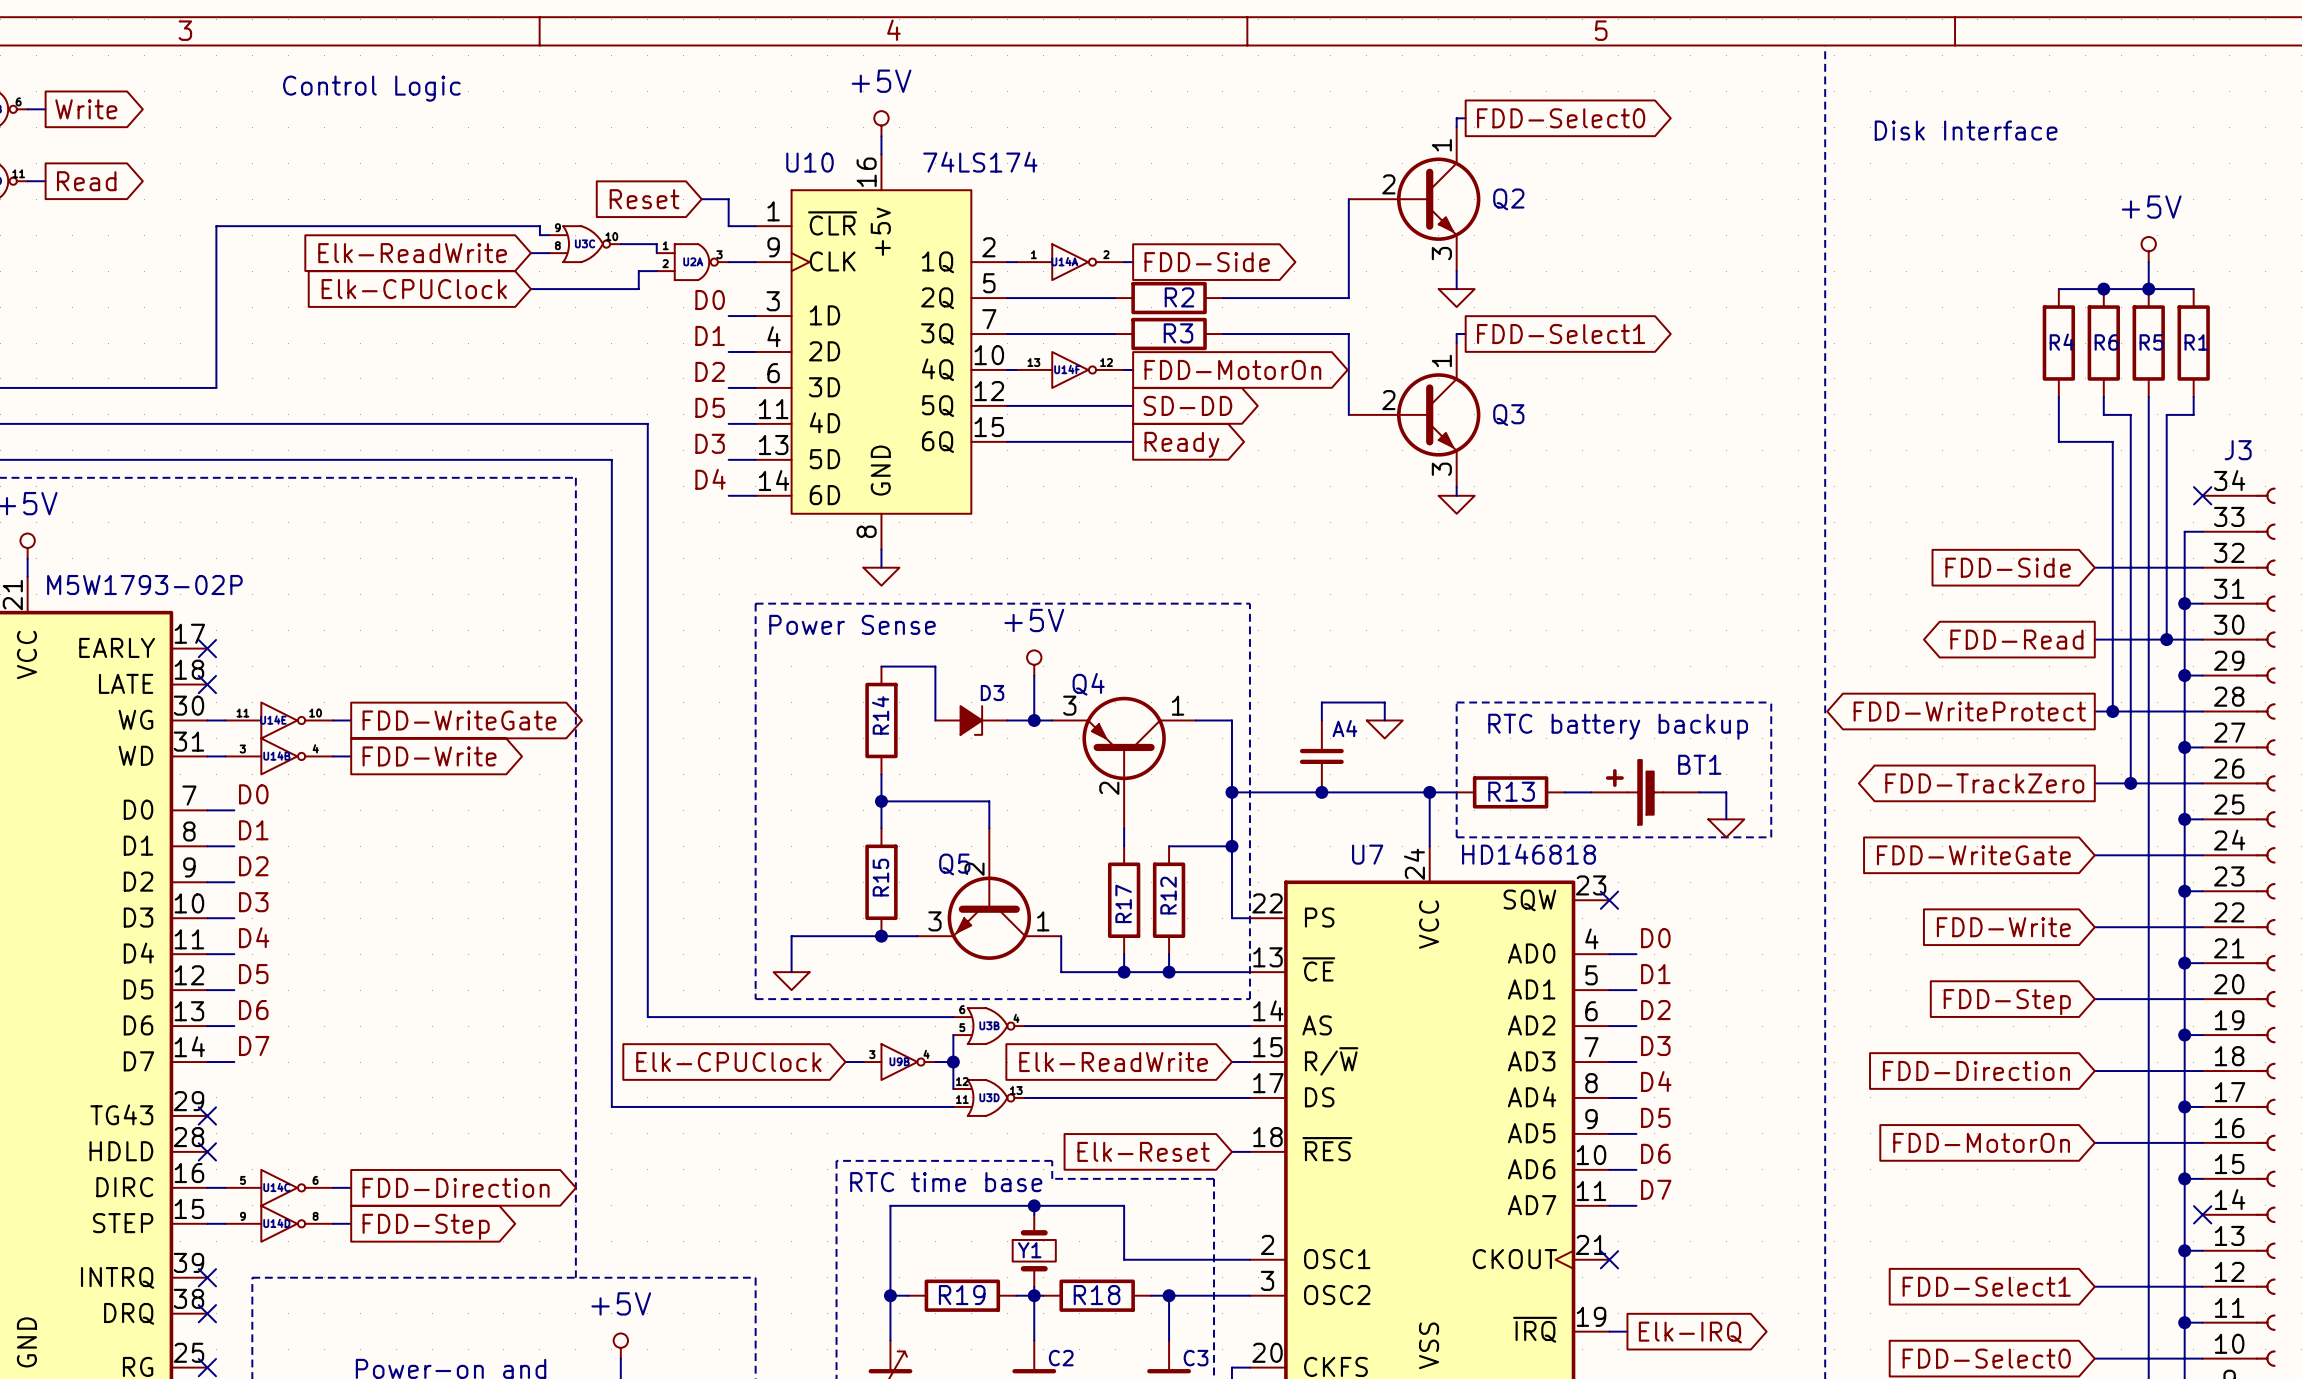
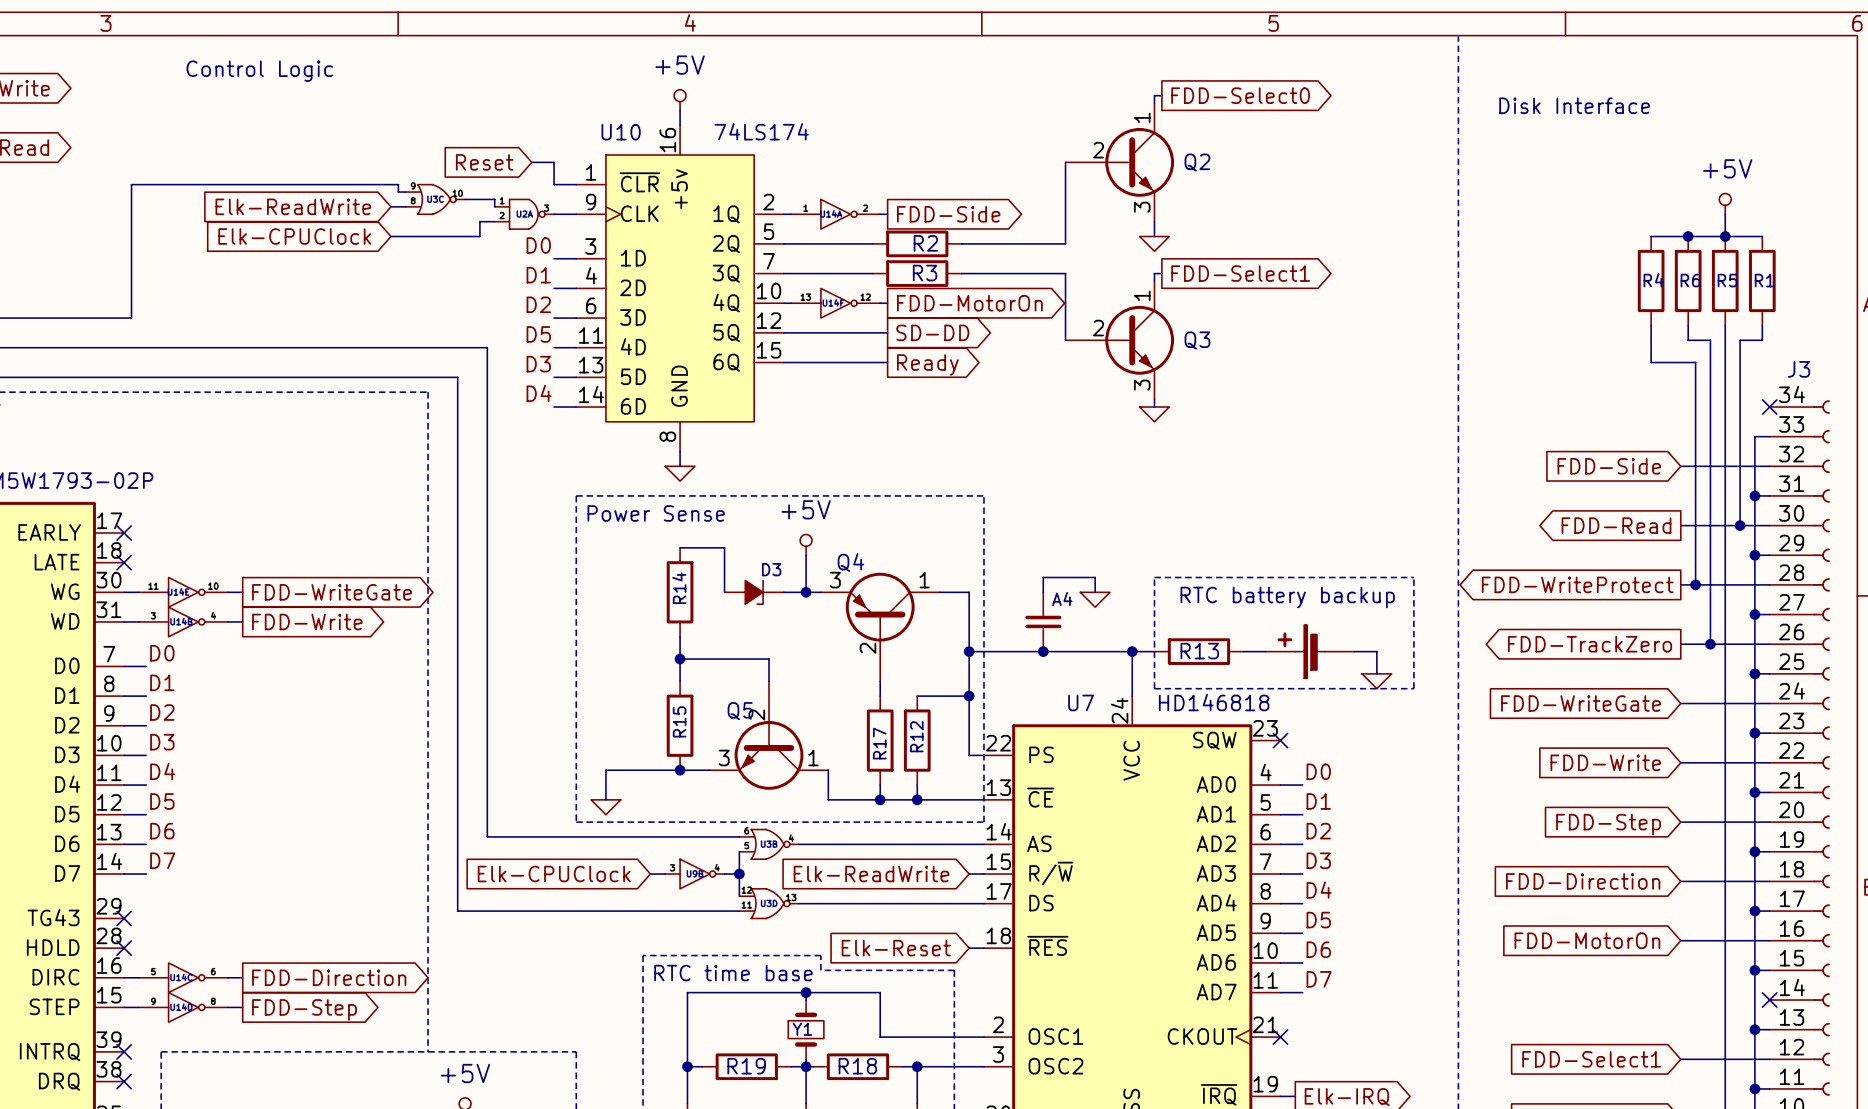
BT1: (1645, 792) -> none

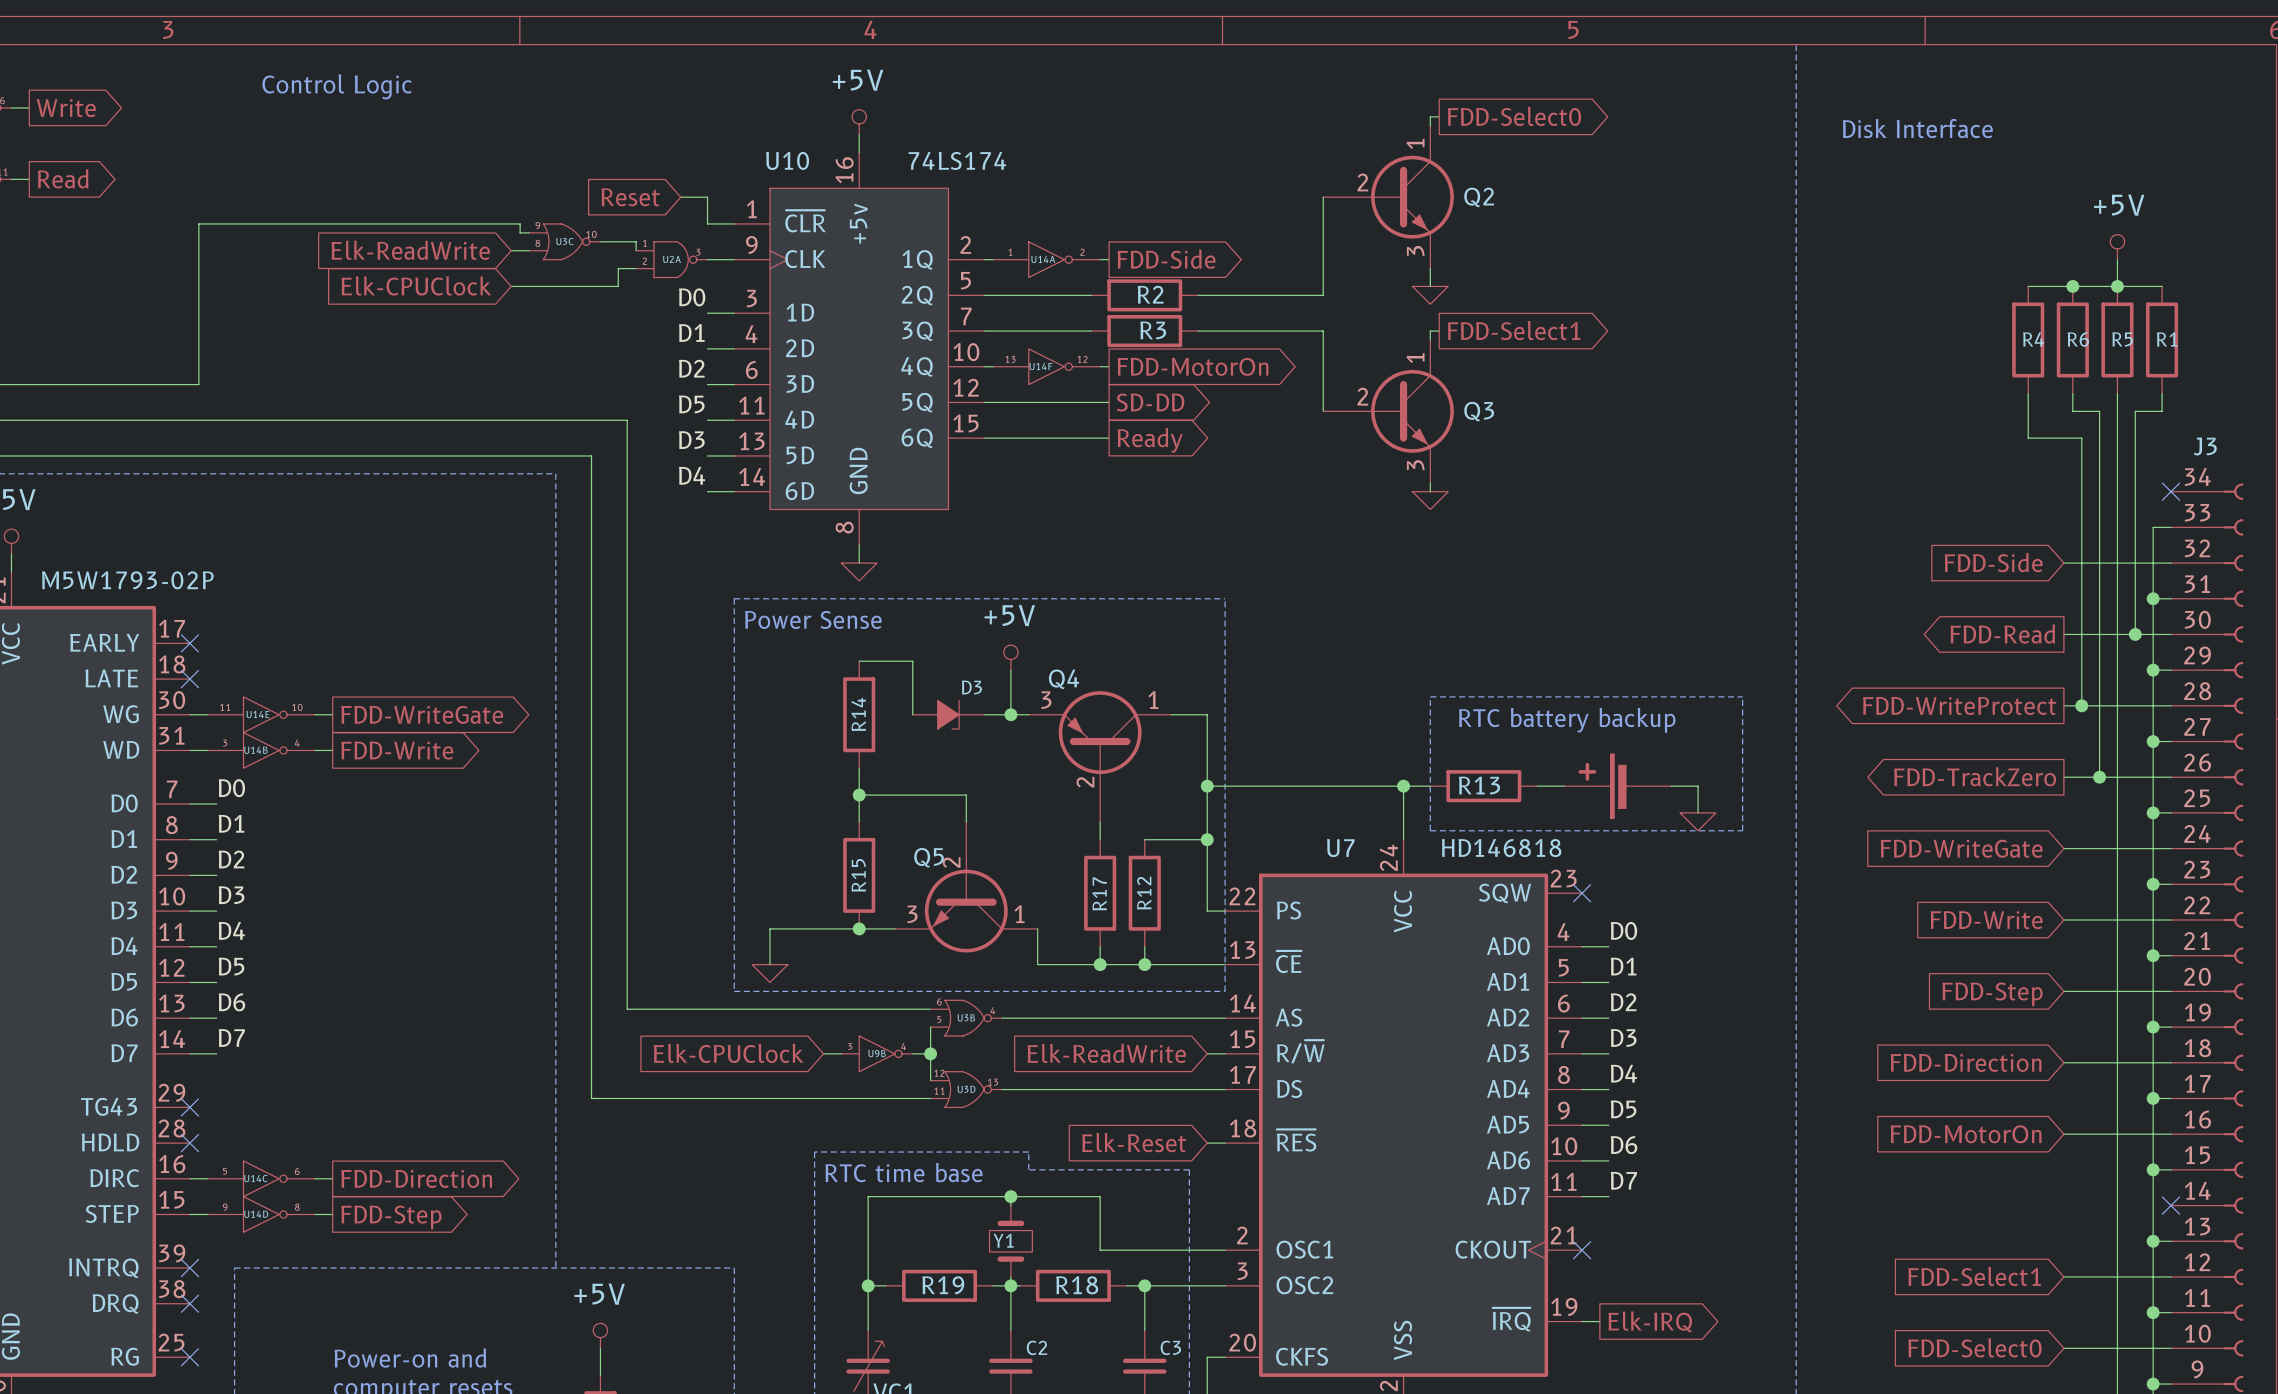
wire: (1043, 592) (1043, 577) (1095, 577) (1095, 592) -> none
power symbol: (1095, 599) -> none
A4: (1043, 621) -> none
junction: (1043, 651) -> none

